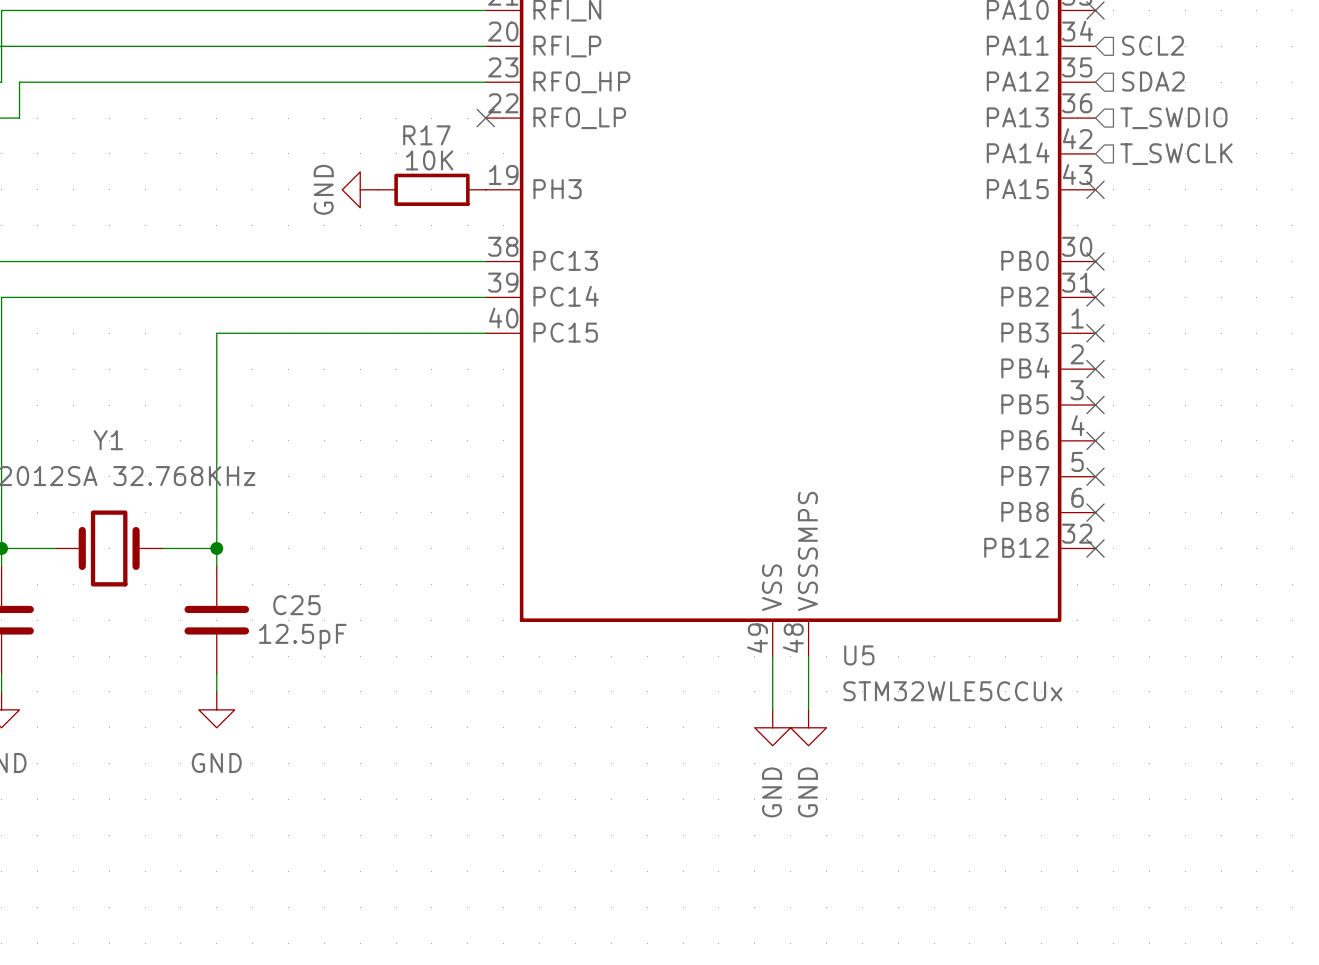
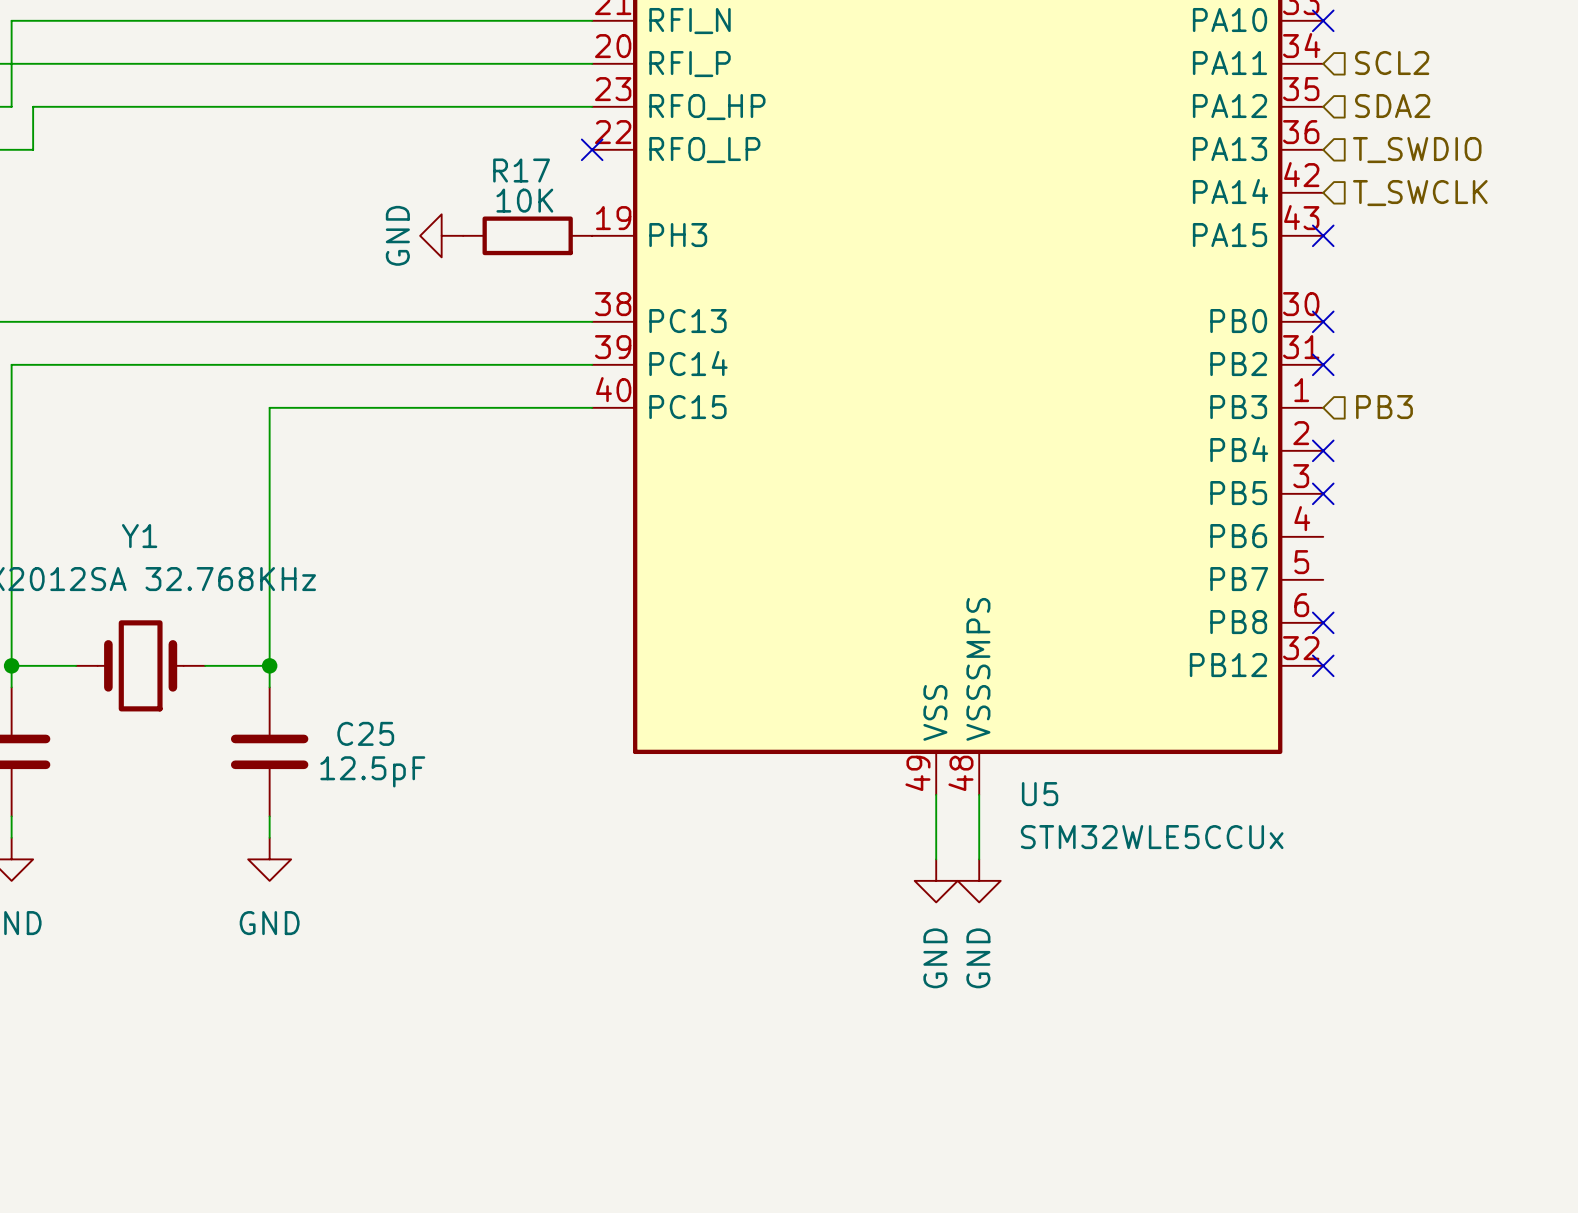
hierarchical label: none -> PB3 (1384, 407)
no-connect mark: (1095, 333) -> none
no-connect mark: (1095, 440) -> none
no-connect mark: (1095, 476) -> none

